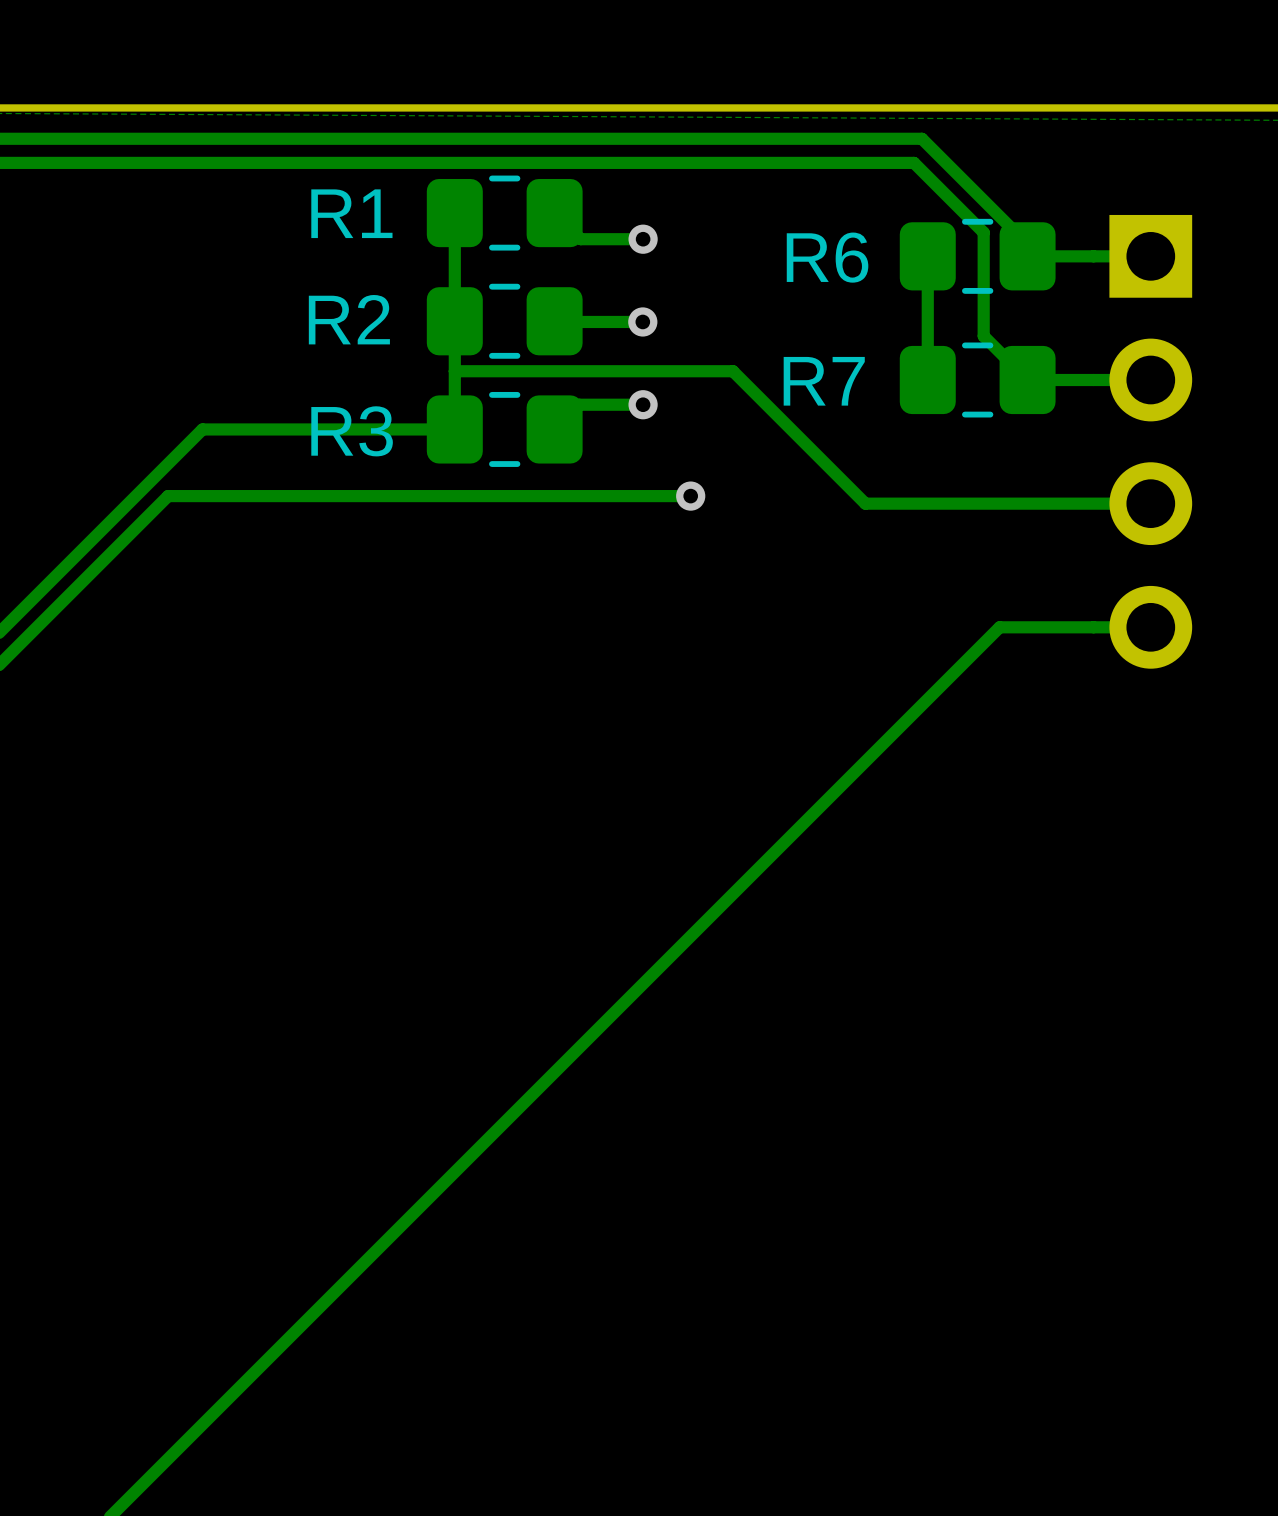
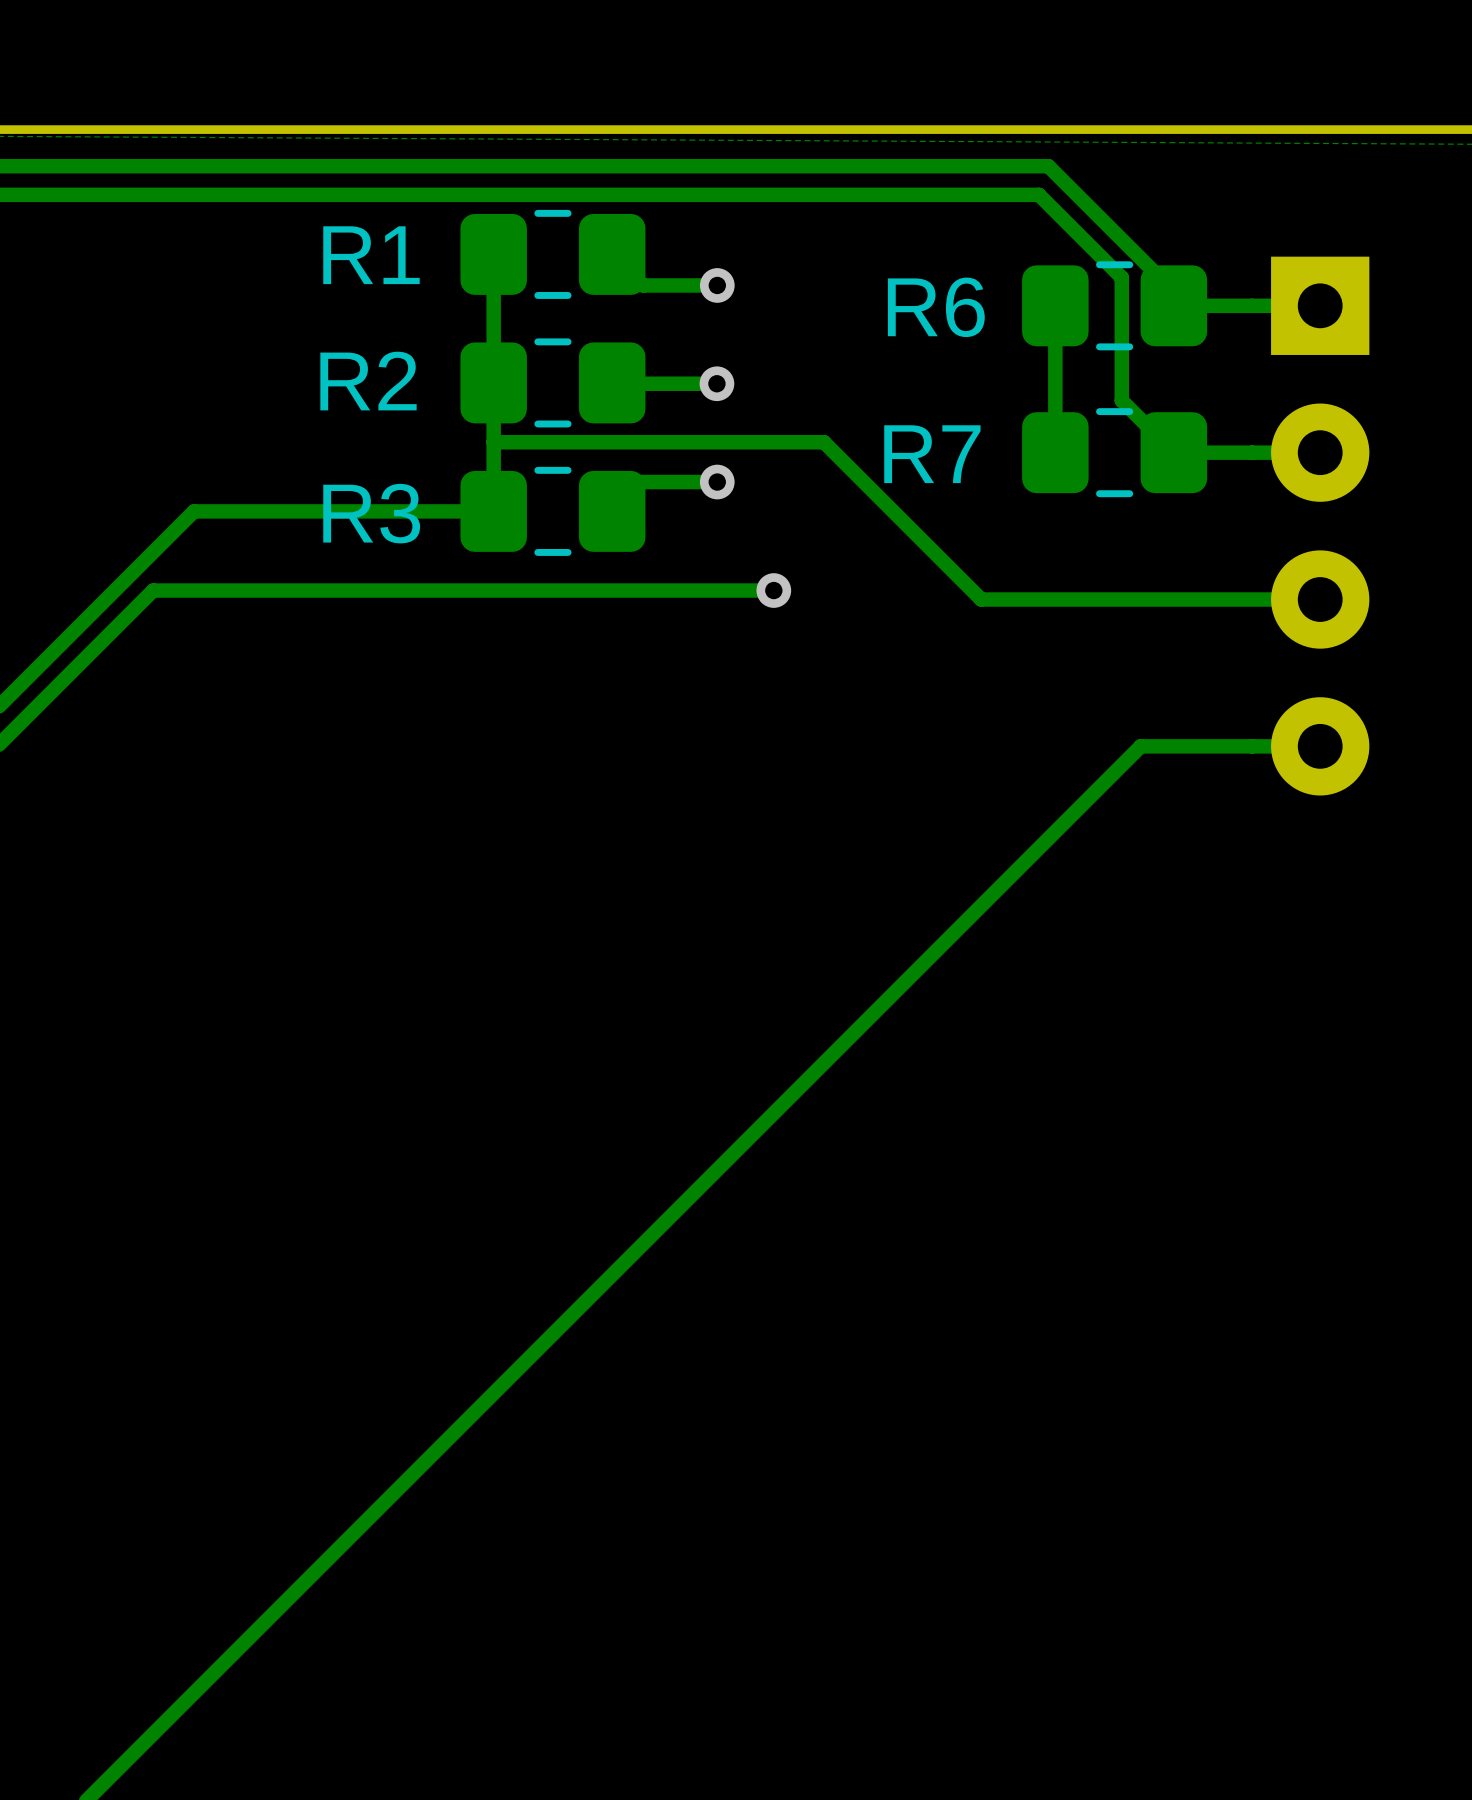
part footprint: [1109, 214, 1193, 669] -> [1271, 256, 1370, 796]

